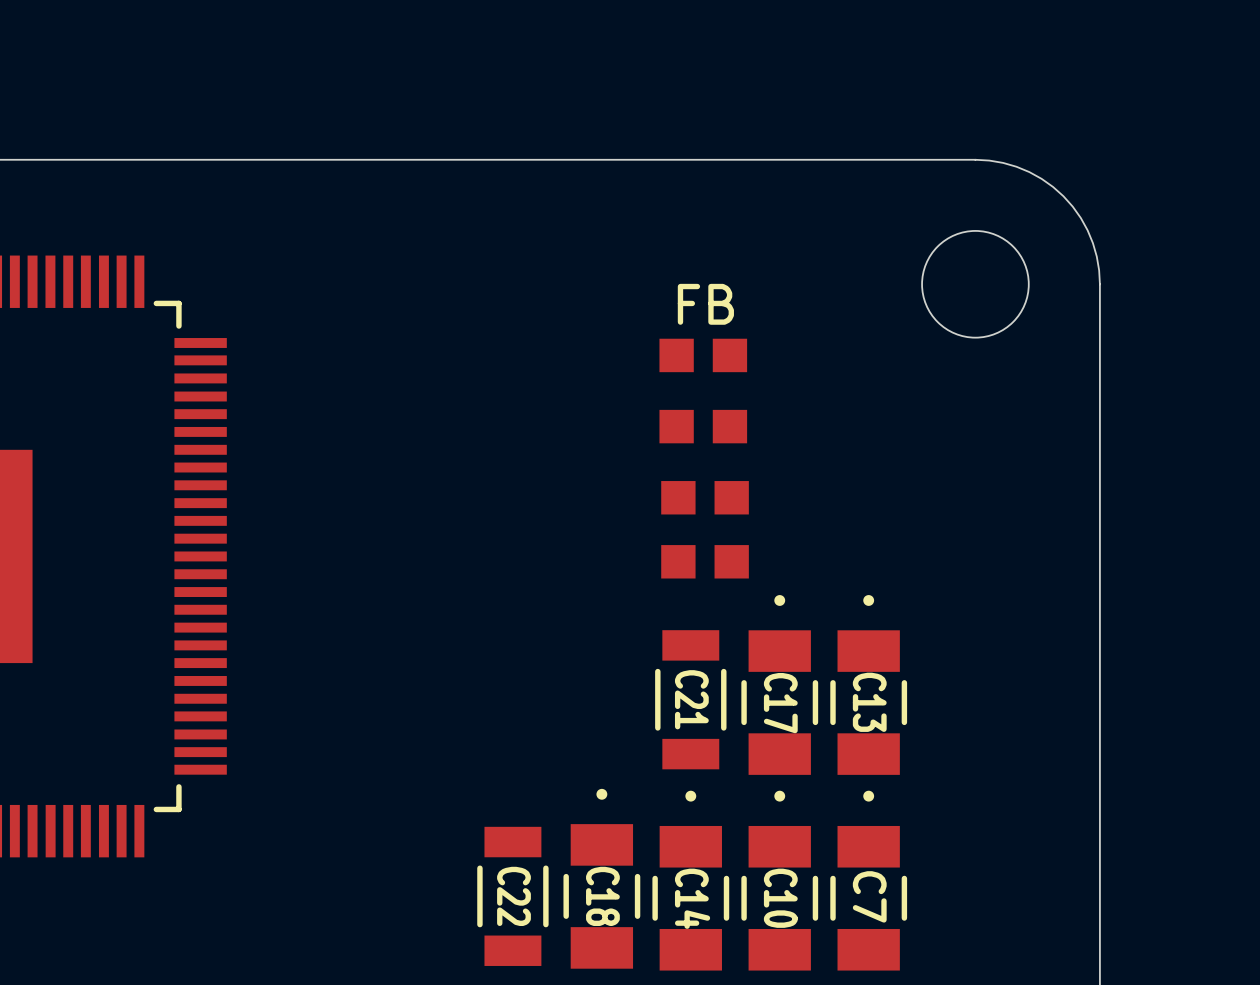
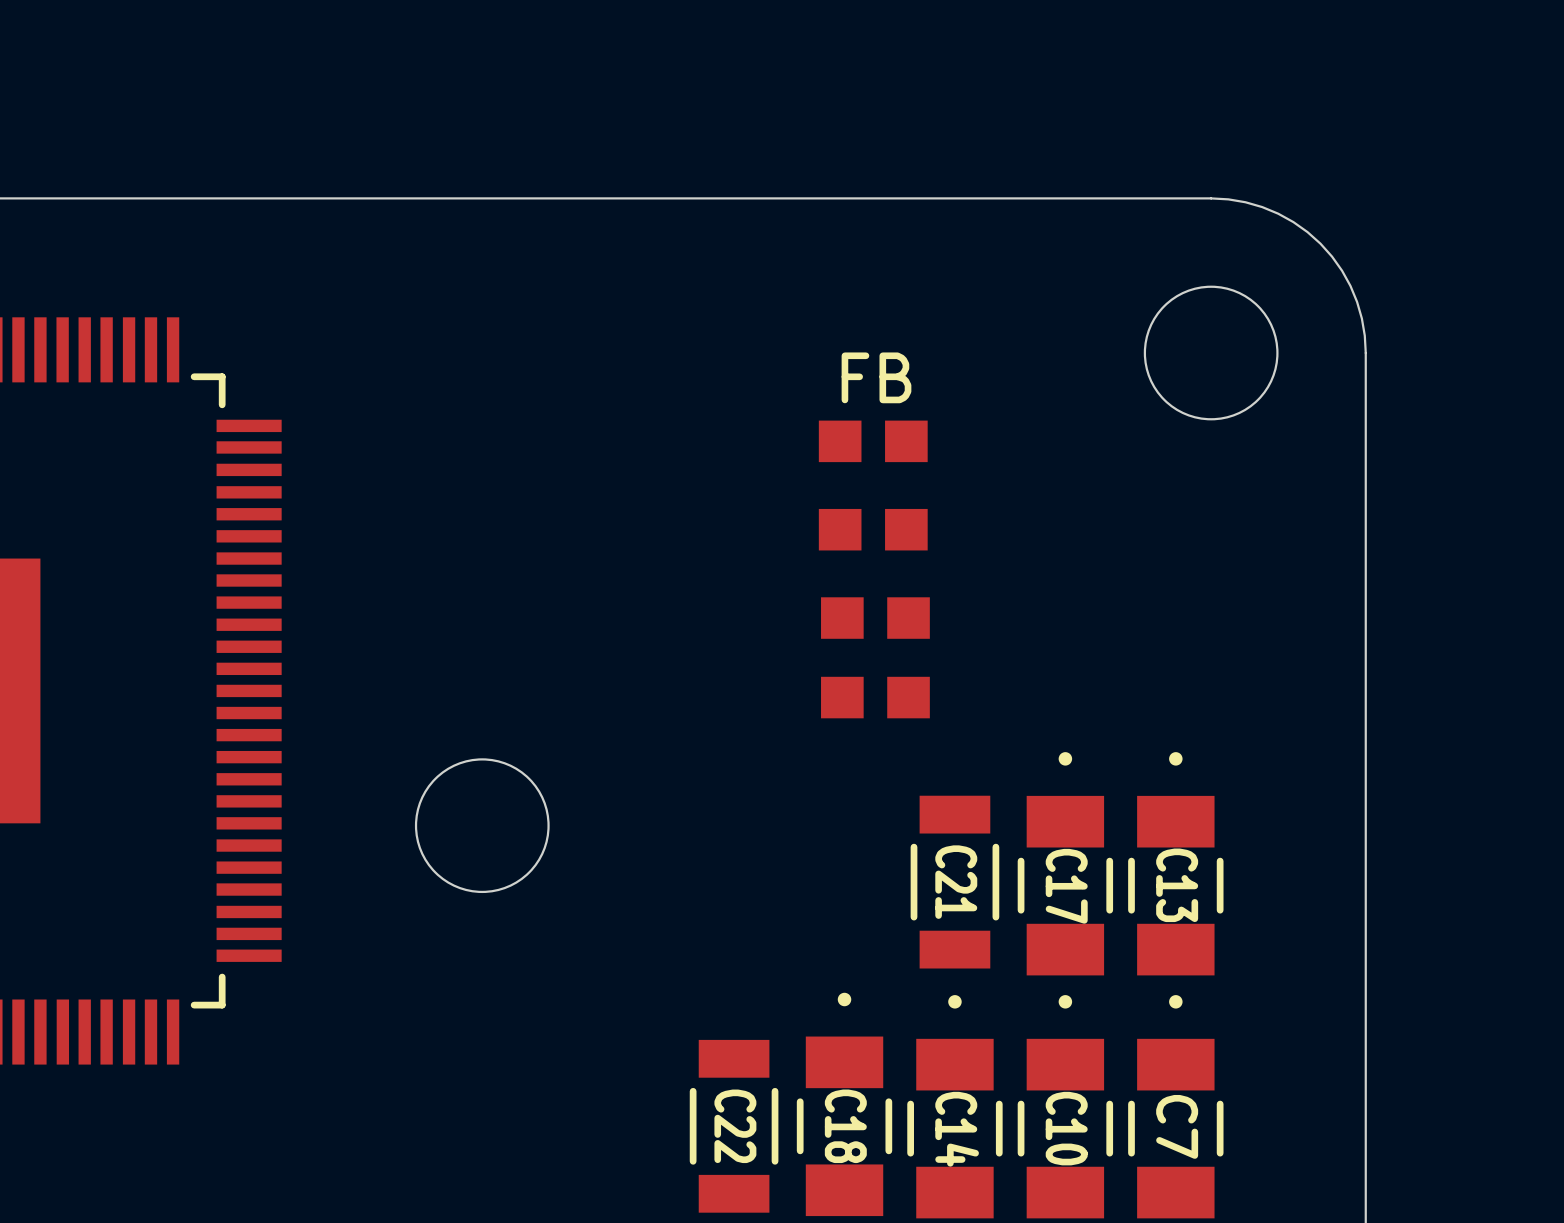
round board edge: none -> [414, 758, 550, 894]
C17 position: (779, 684) -> (1065, 863)
C13 position: (868, 684) -> (1175, 863)
C21 position: (690, 699) -> (954, 882)
C18 position: (601, 878) -> (844, 1104)
C14 position: (690, 880) -> (954, 1106)
C10 position: (779, 880) -> (1065, 1106)
C7 position: (868, 880) -> (1175, 1106)
C22 position: (512, 896) -> (734, 1126)

